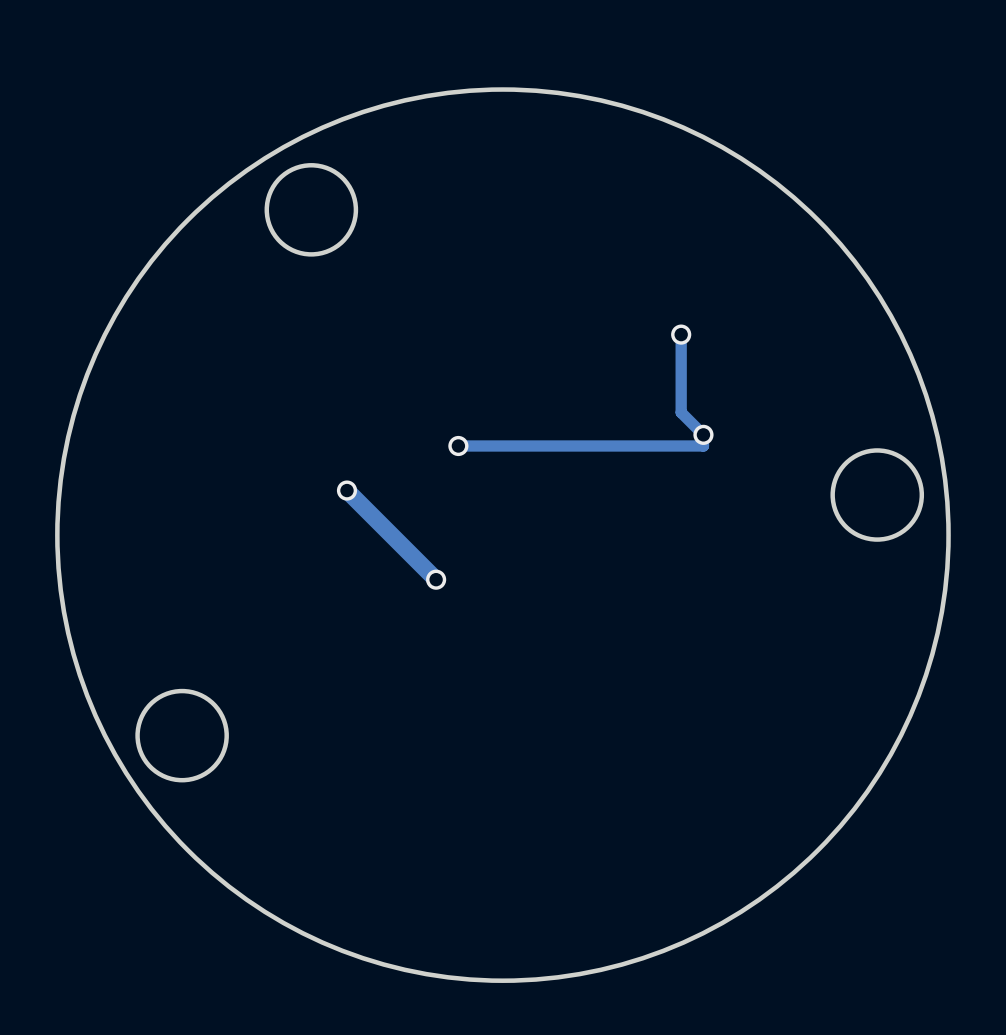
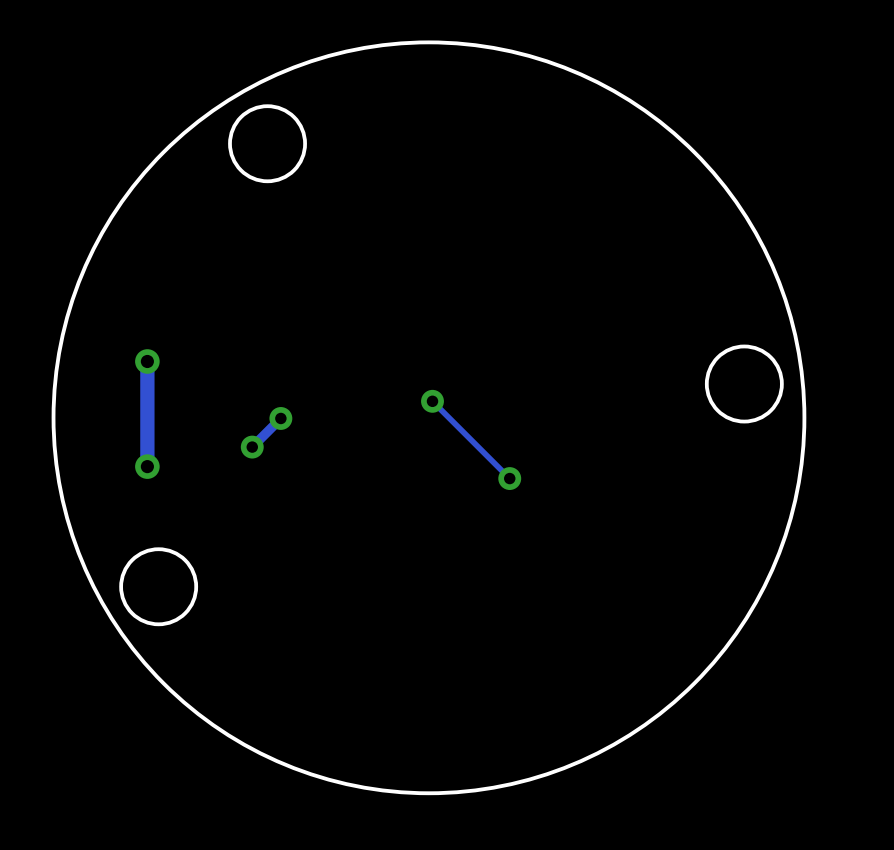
track: (681, 334) (681, 412) (703, 434) (703, 445) (458, 445) -> none
via: (681, 334) -> none
via: (703, 434) -> none
via: (458, 445) -> none
track: none -> (147, 361) (147, 466)
via: none -> (147, 361)
track: (346, 490) (436, 579) -> none
via: (346, 490) -> none
track: none -> (432, 401) (509, 478)
via: none -> (432, 401)
track: none -> (280, 418) (252, 447)
via: none -> (280, 418)
via: none -> (252, 447)
via: (436, 579) -> none
via: none -> (147, 466)
via: none -> (509, 478)

